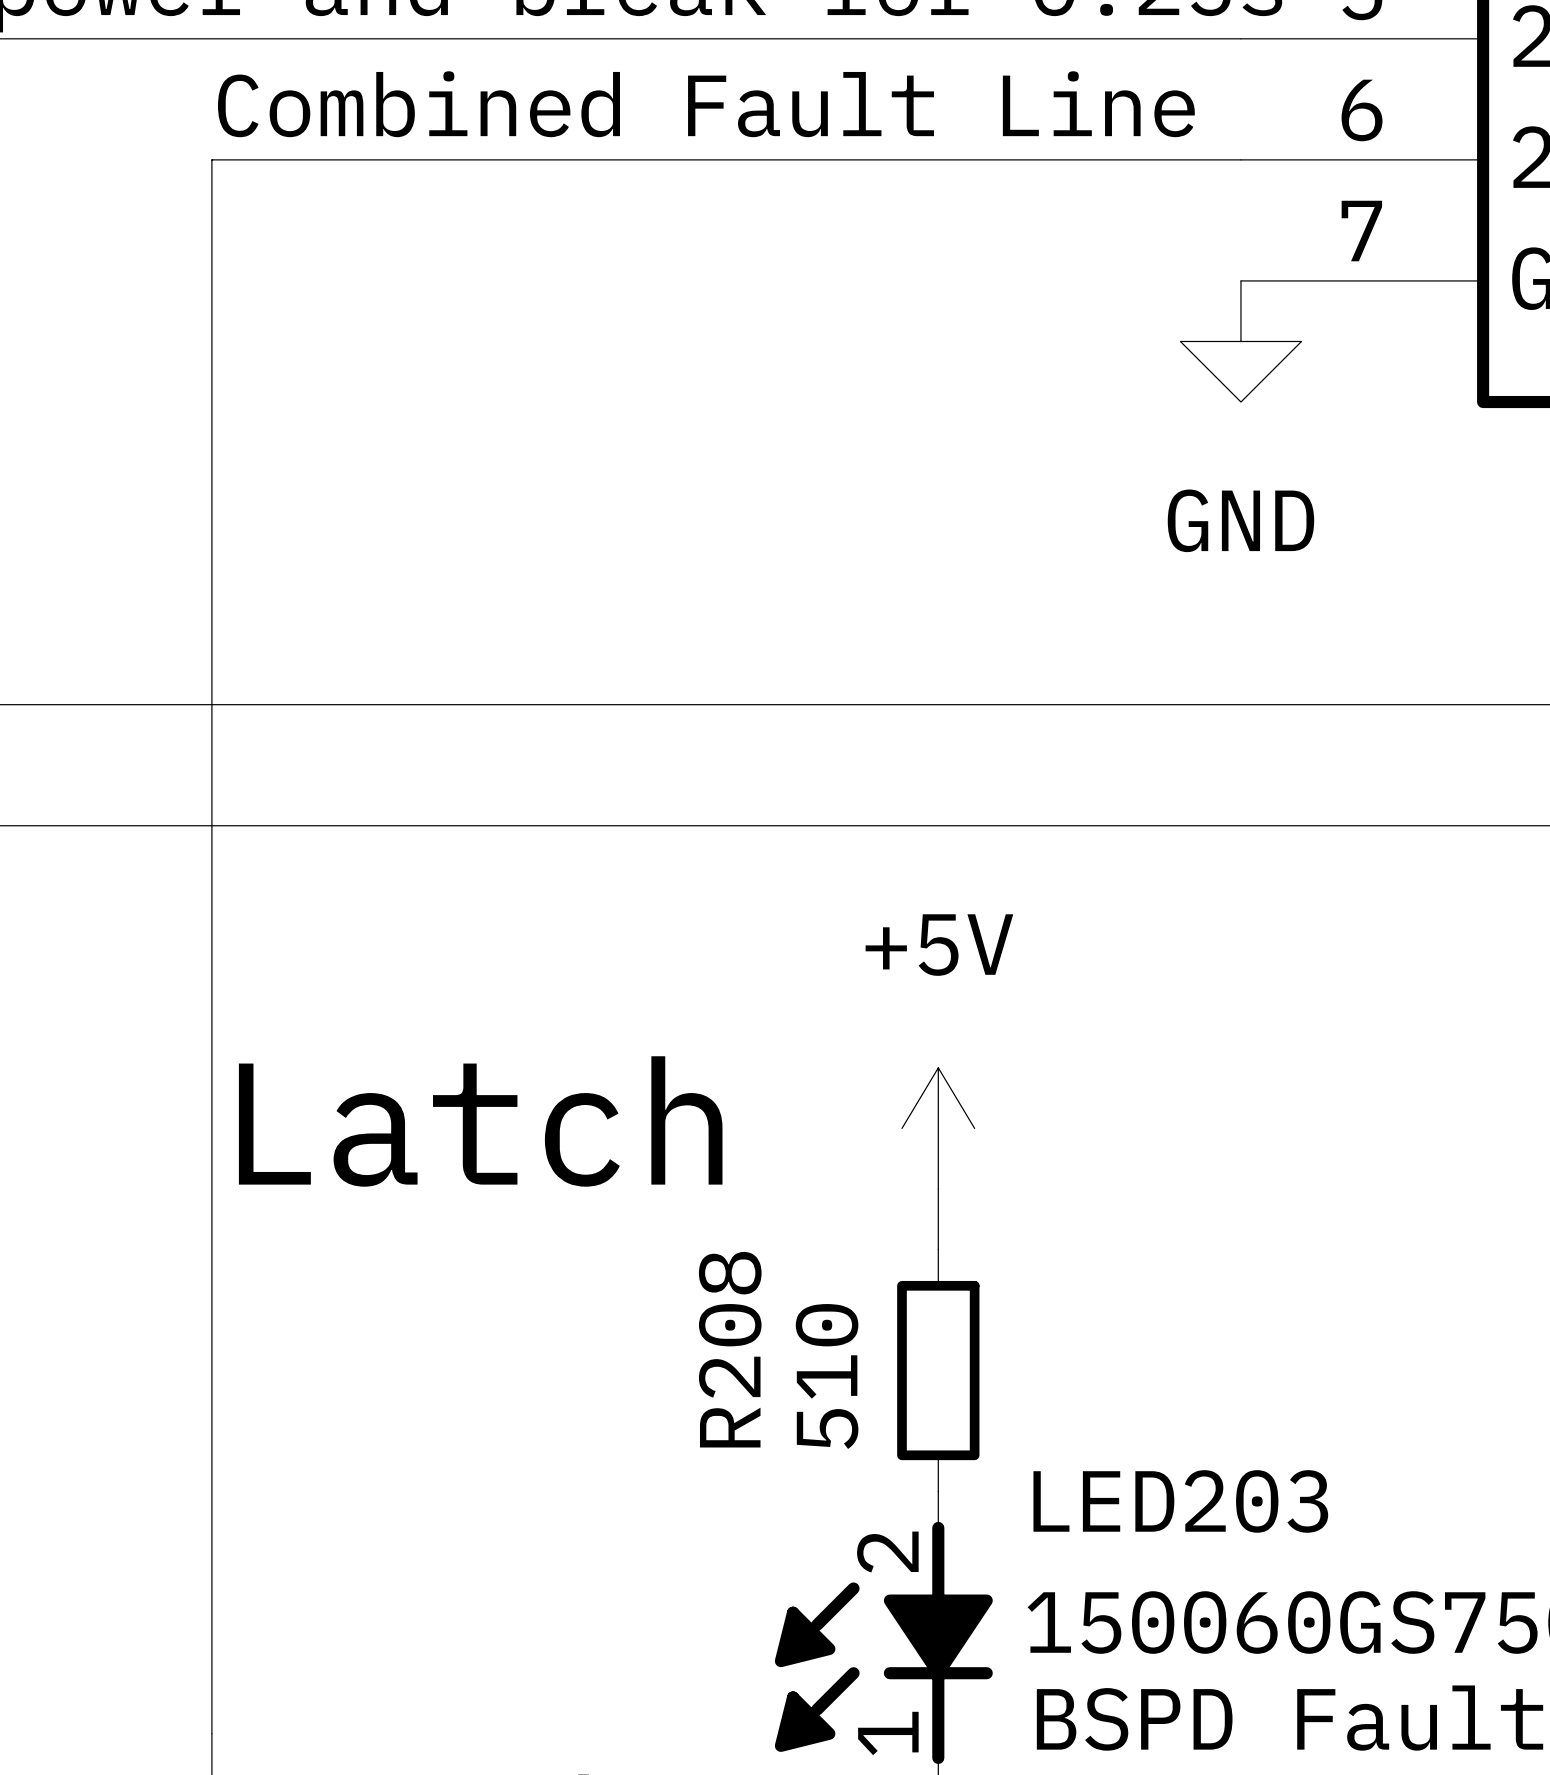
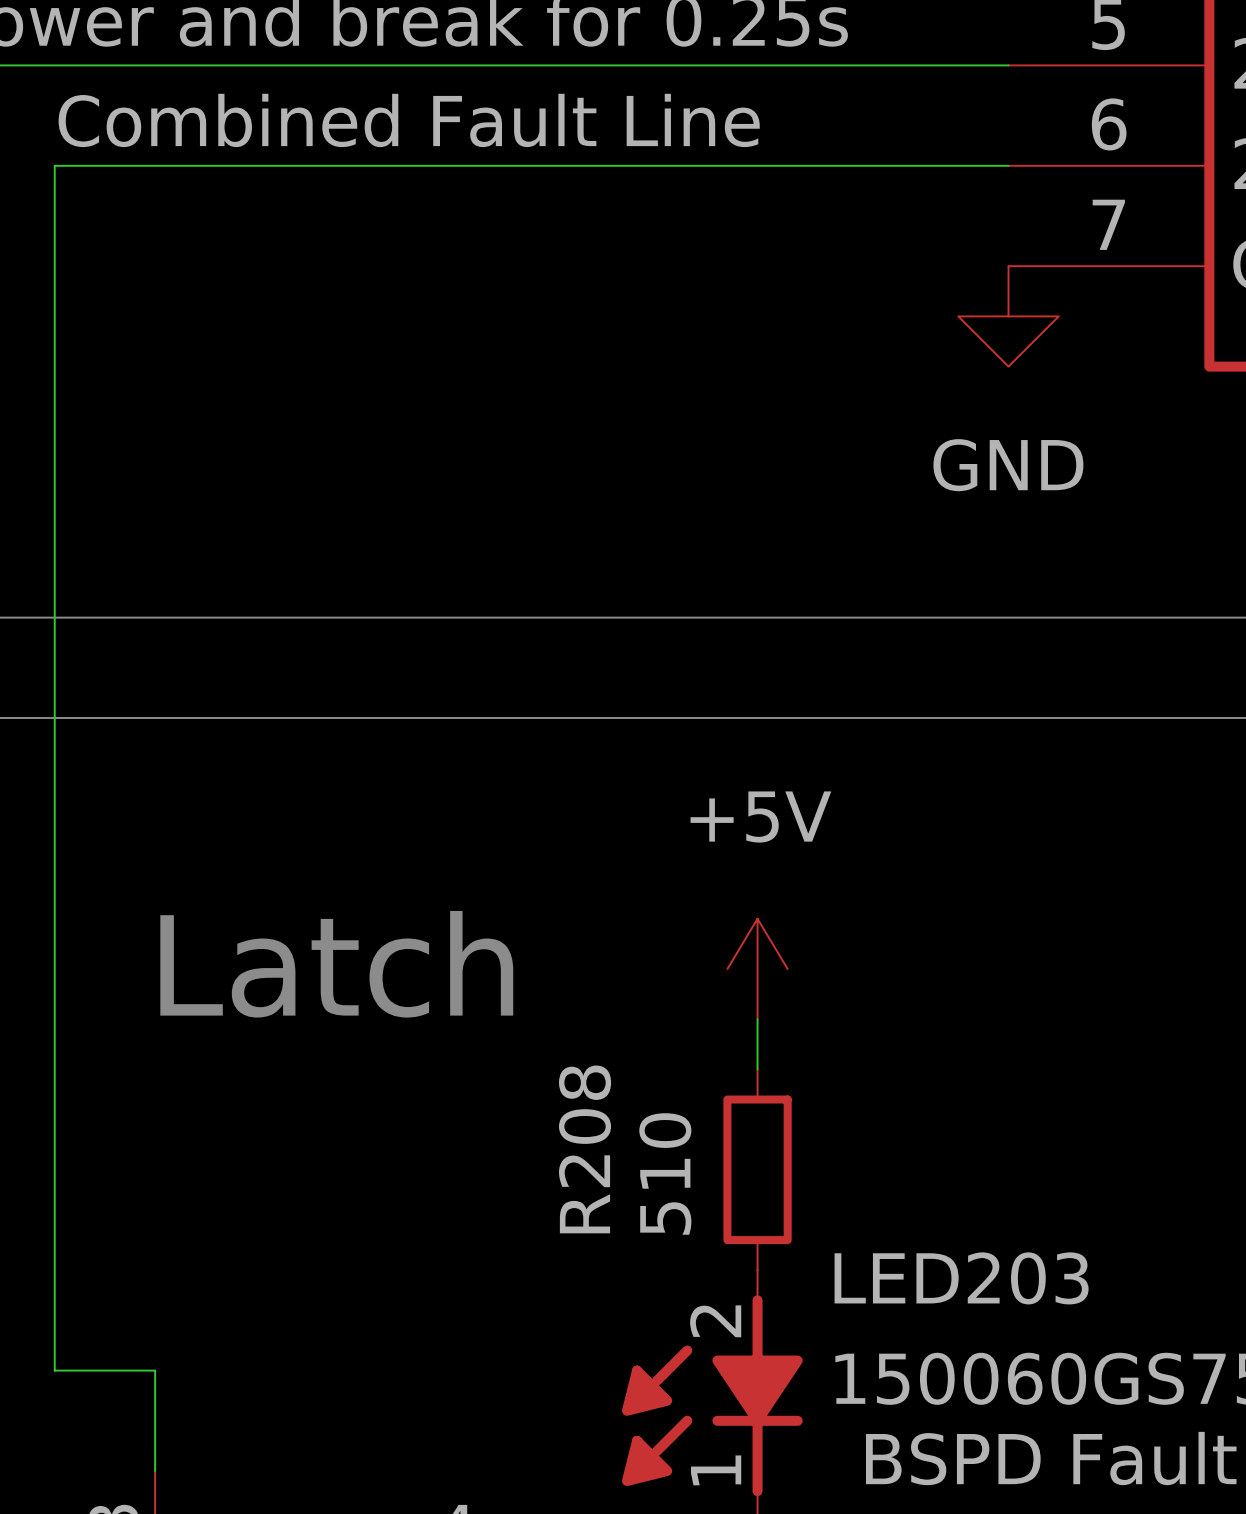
label position: Combined Fault Line (706, 104) -> Combined Fault Line (409, 120)
wire: (211, 159) (211, 1612) -> (155, 165) (54, 165) (54, 1370) (155, 1370)
text position: Latch (480, 1121) -> Latch (336, 964)

